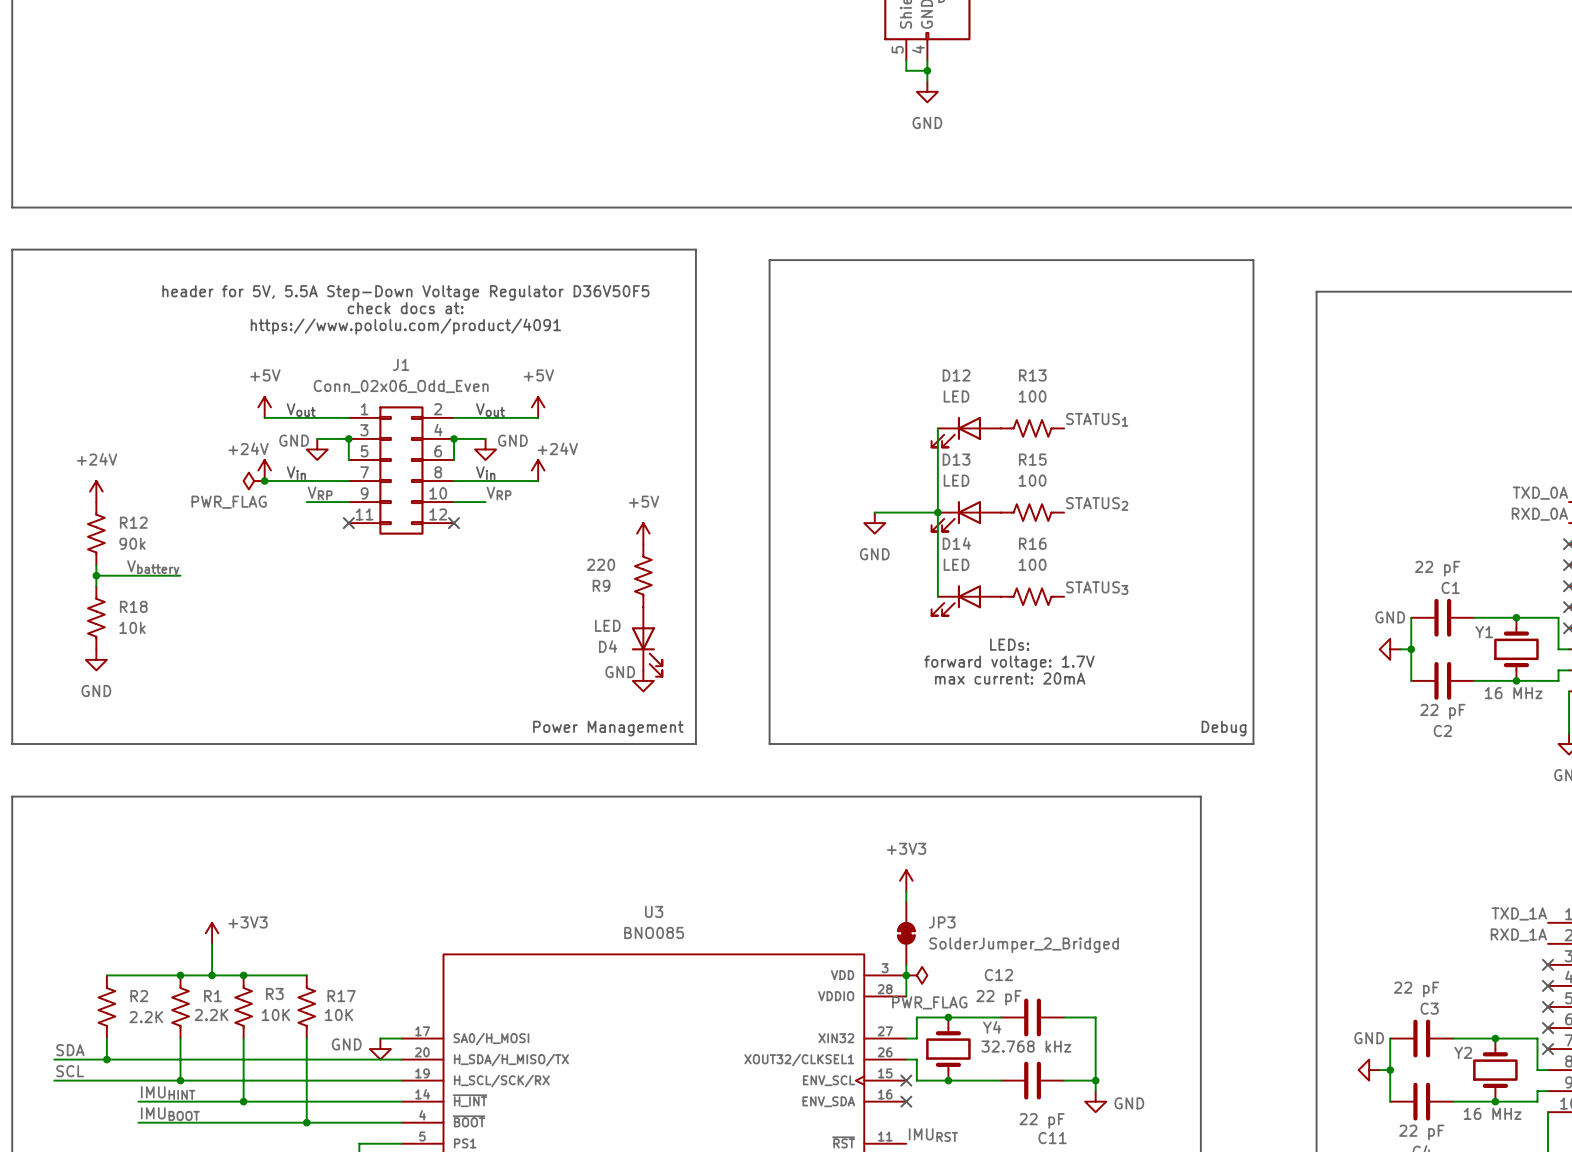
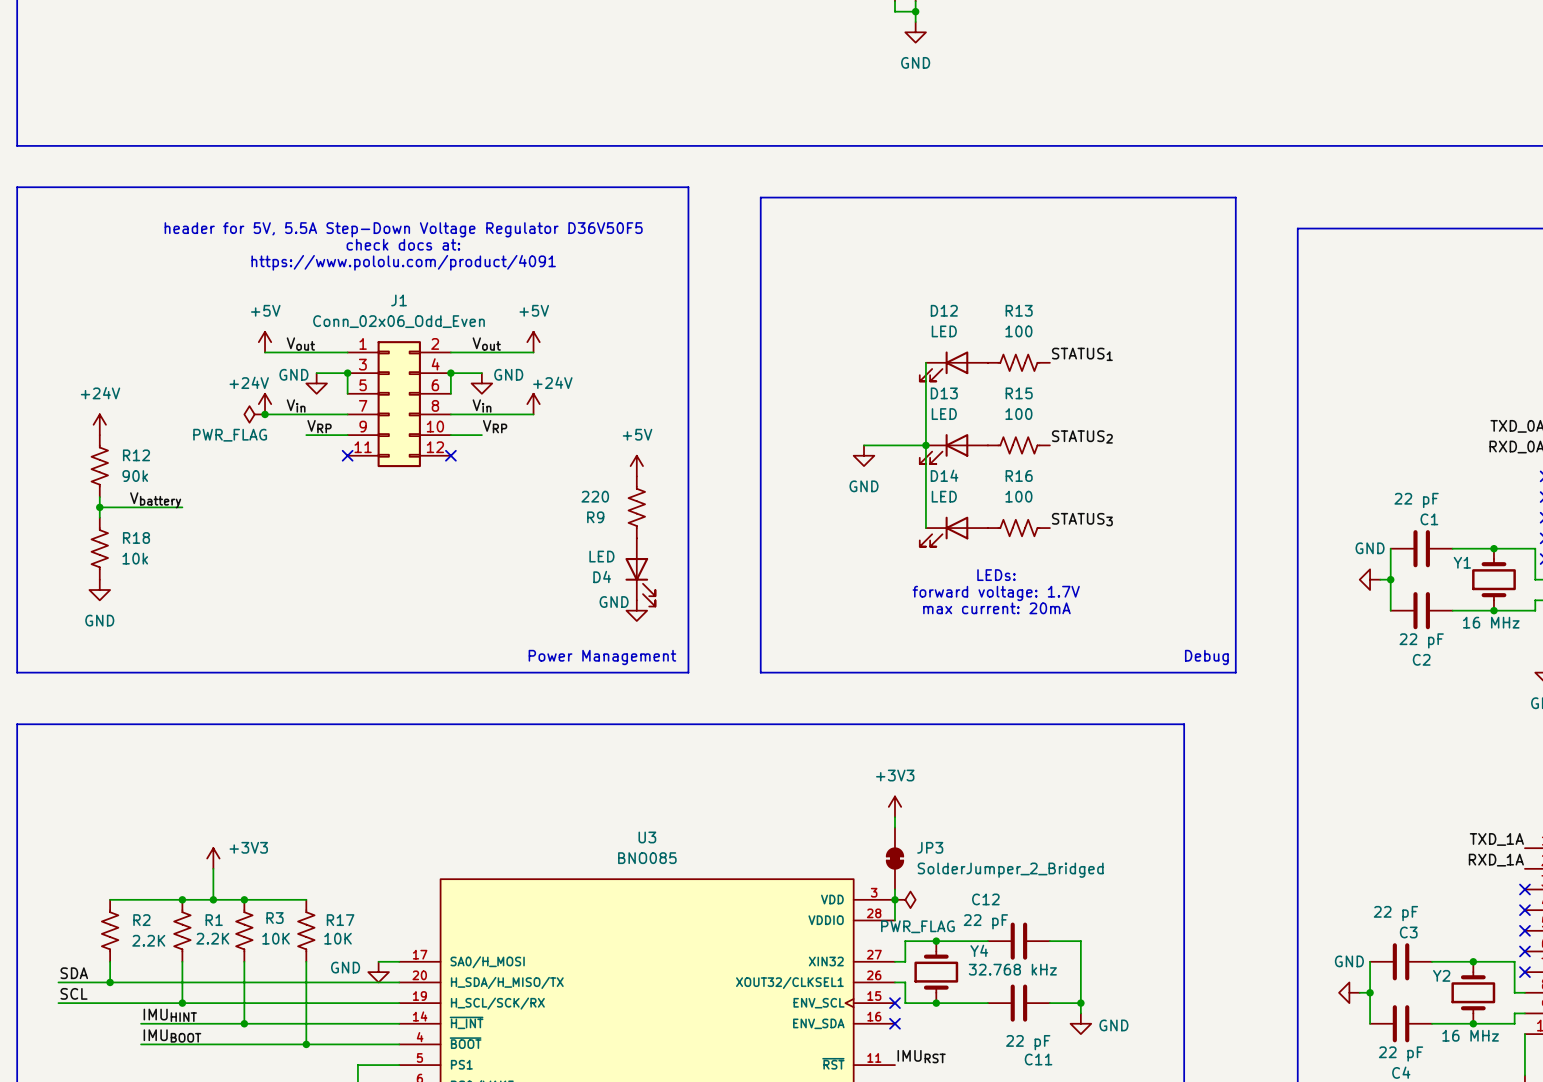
label: none -> Vout (300, 344)
label: none -> Vout (486, 344)
text: Vout (301, 410) -> none
text: Vout (490, 410) -> none
label: none -> Vin (296, 406)
label: none -> Vin (482, 406)
text: Vin (296, 473) -> none
text: Vin (485, 473) -> none

